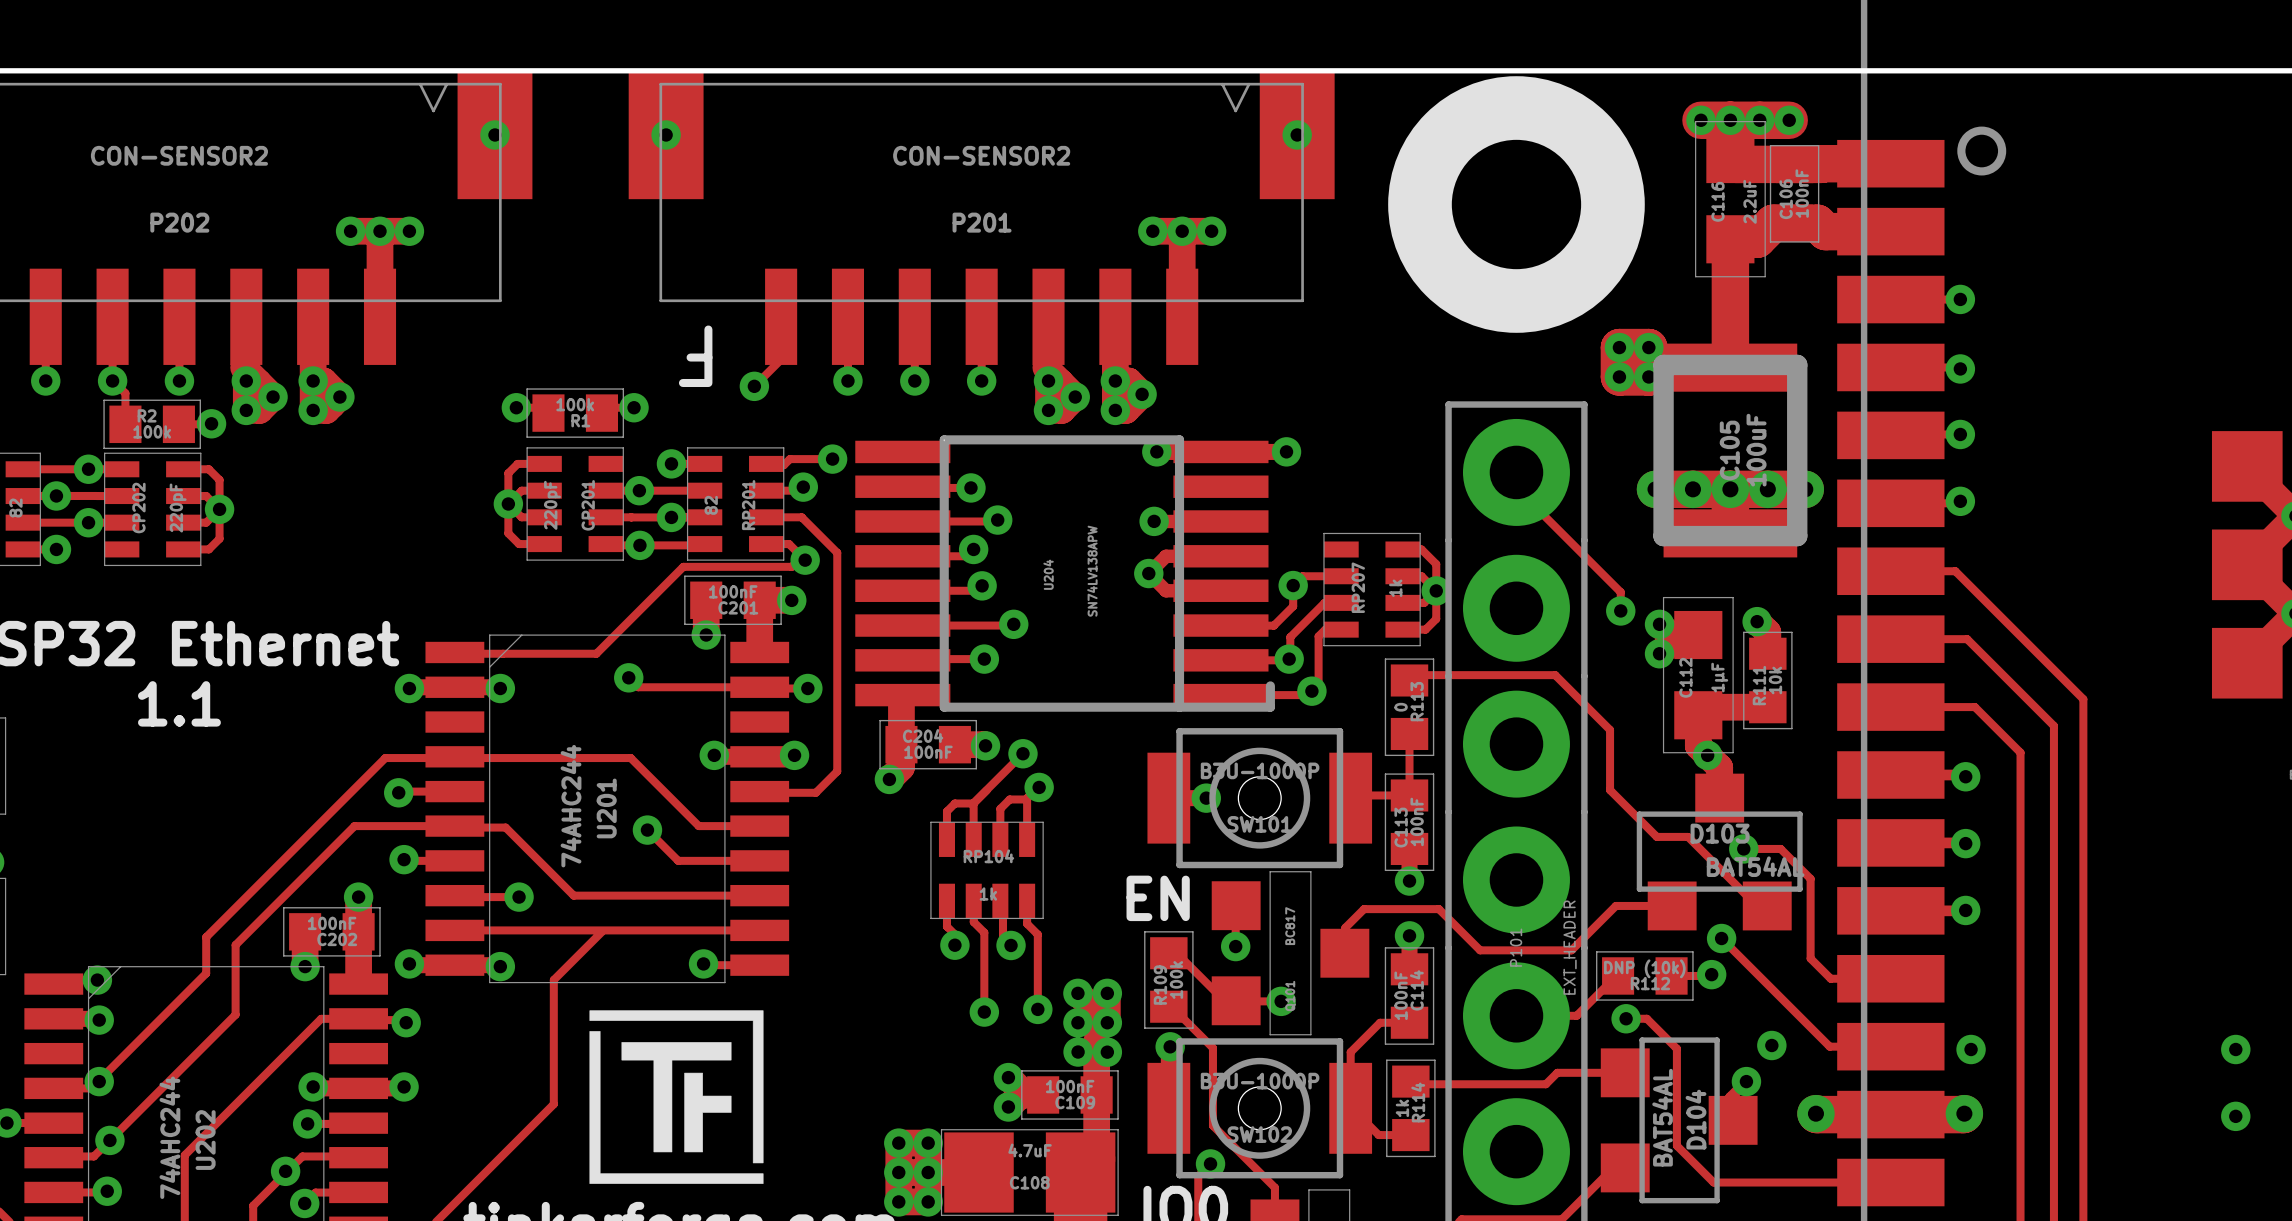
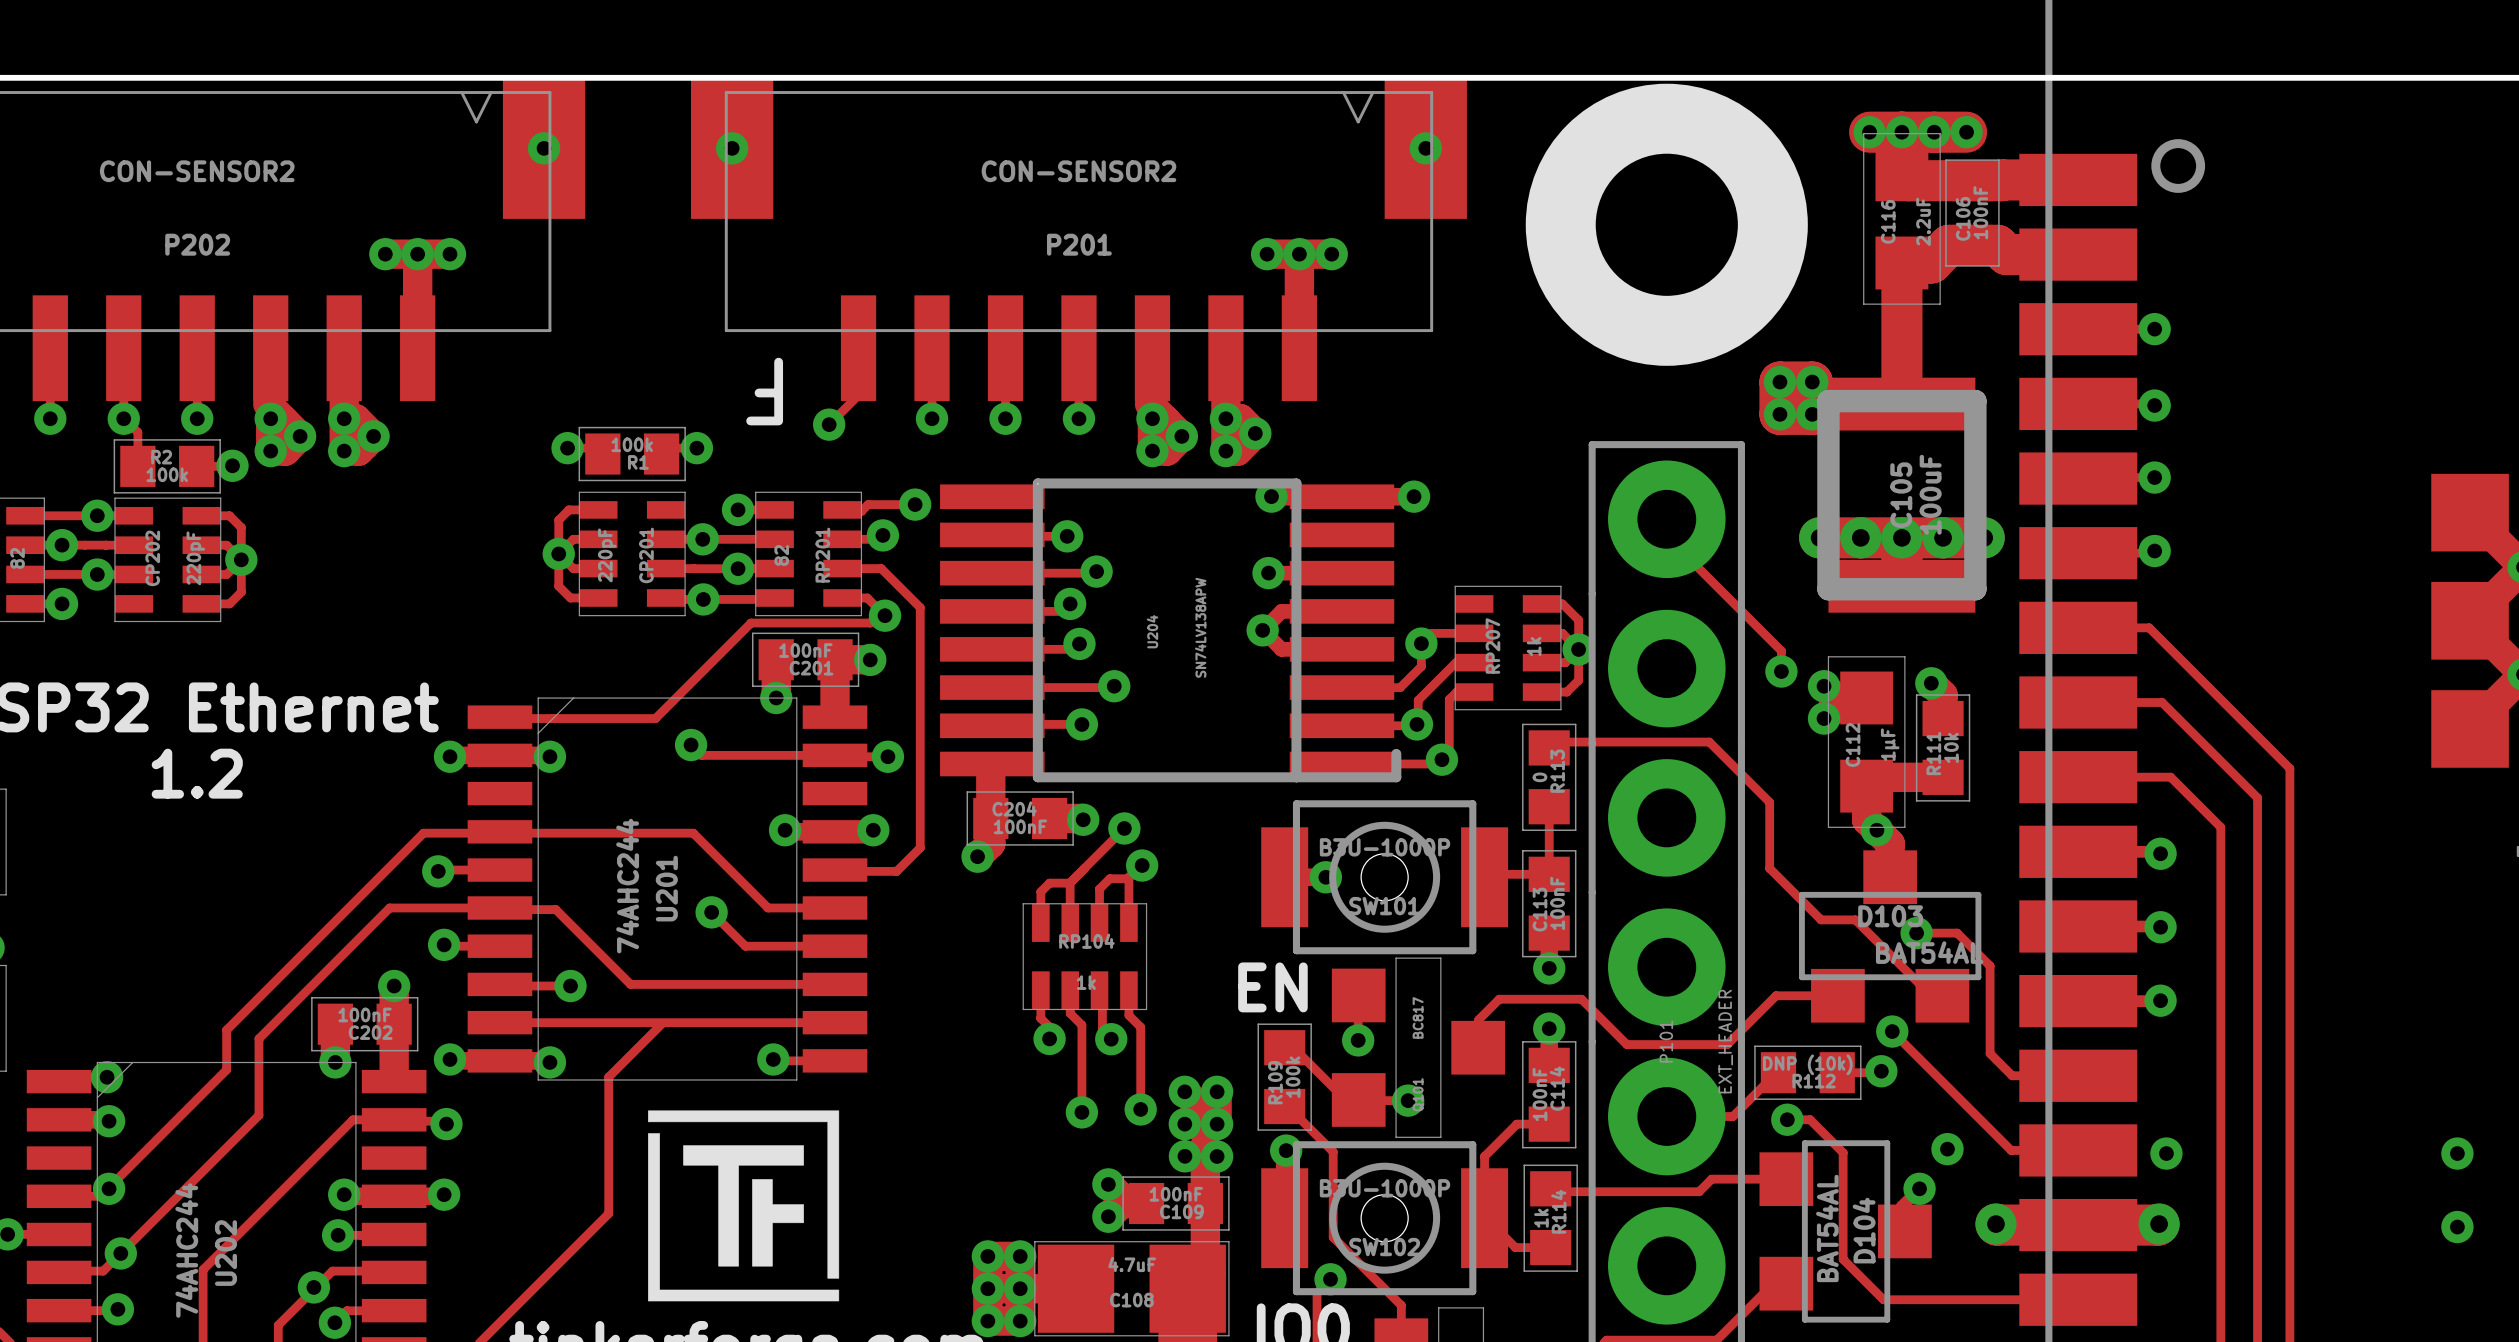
text: 1.1 (179, 703) -> 1.2 (197, 773)

